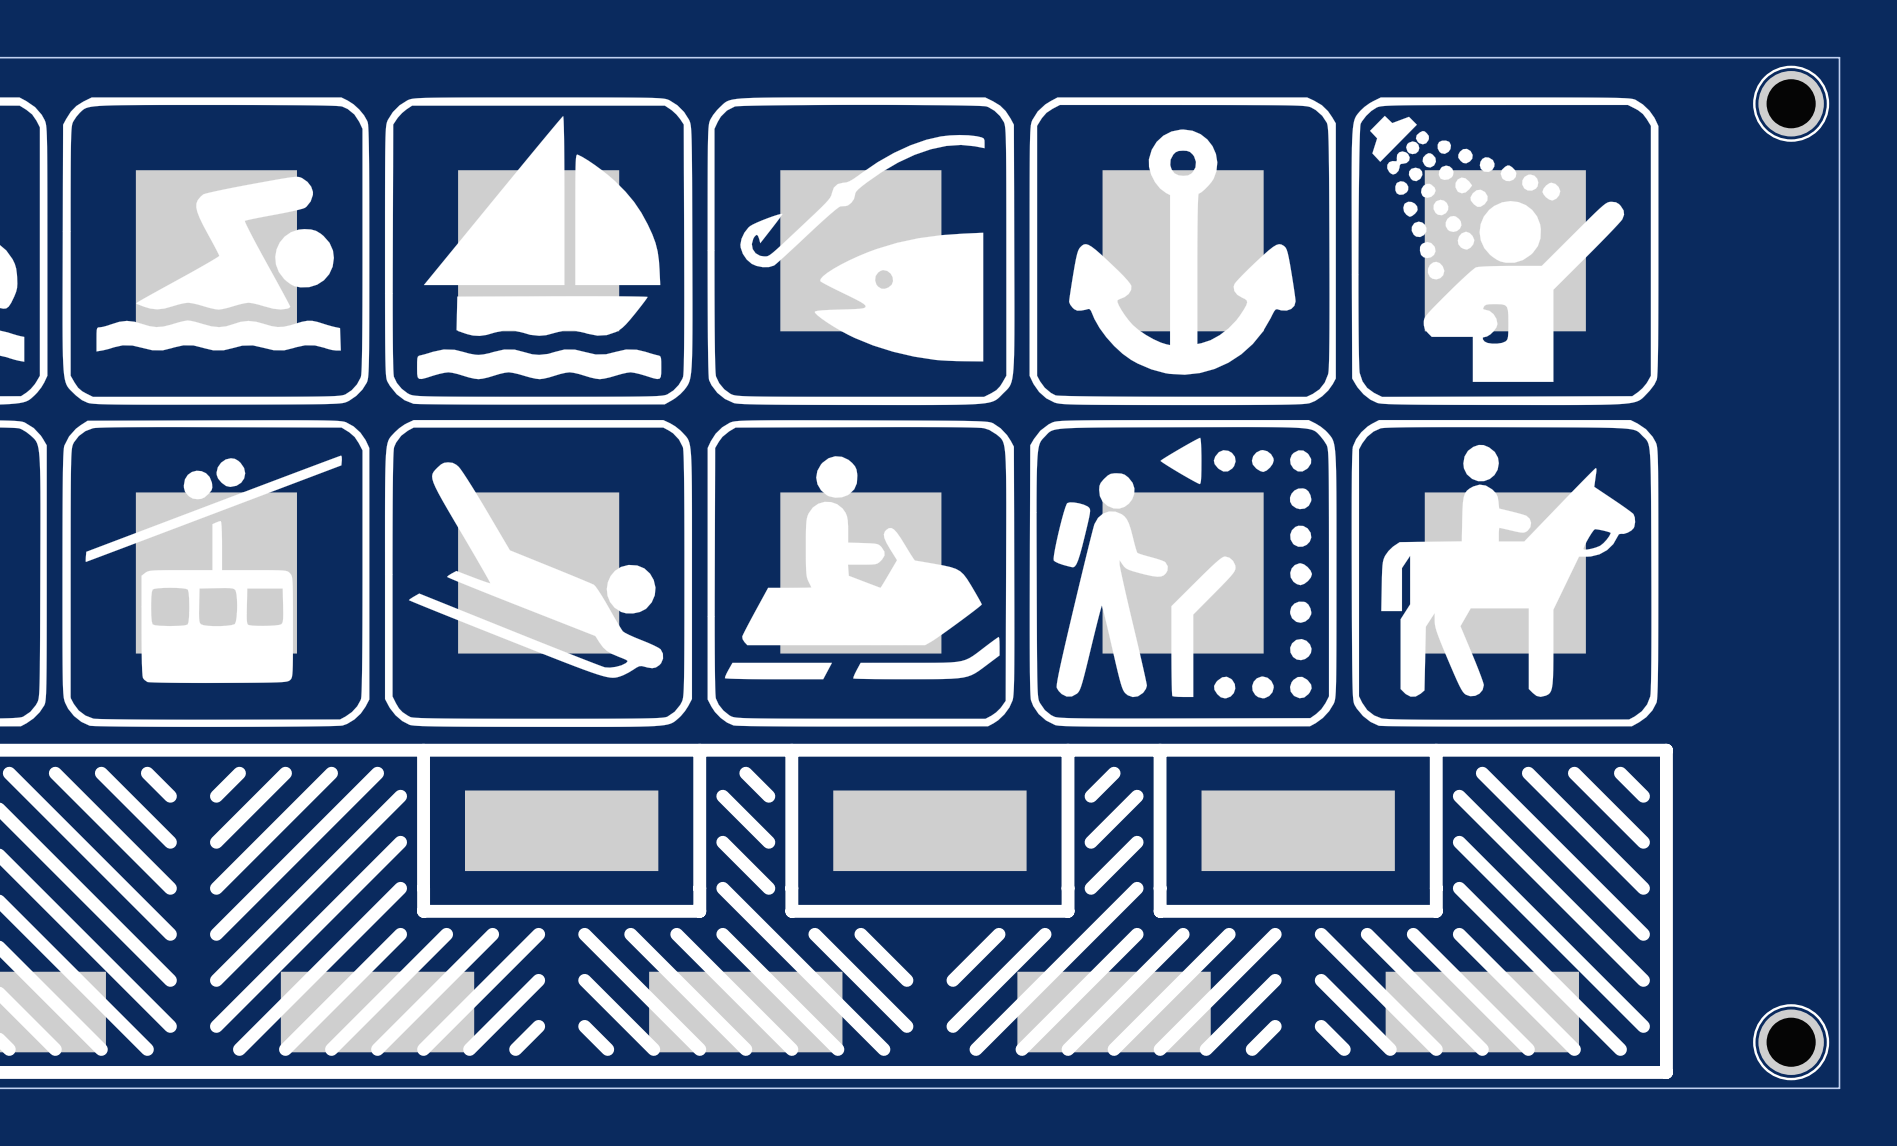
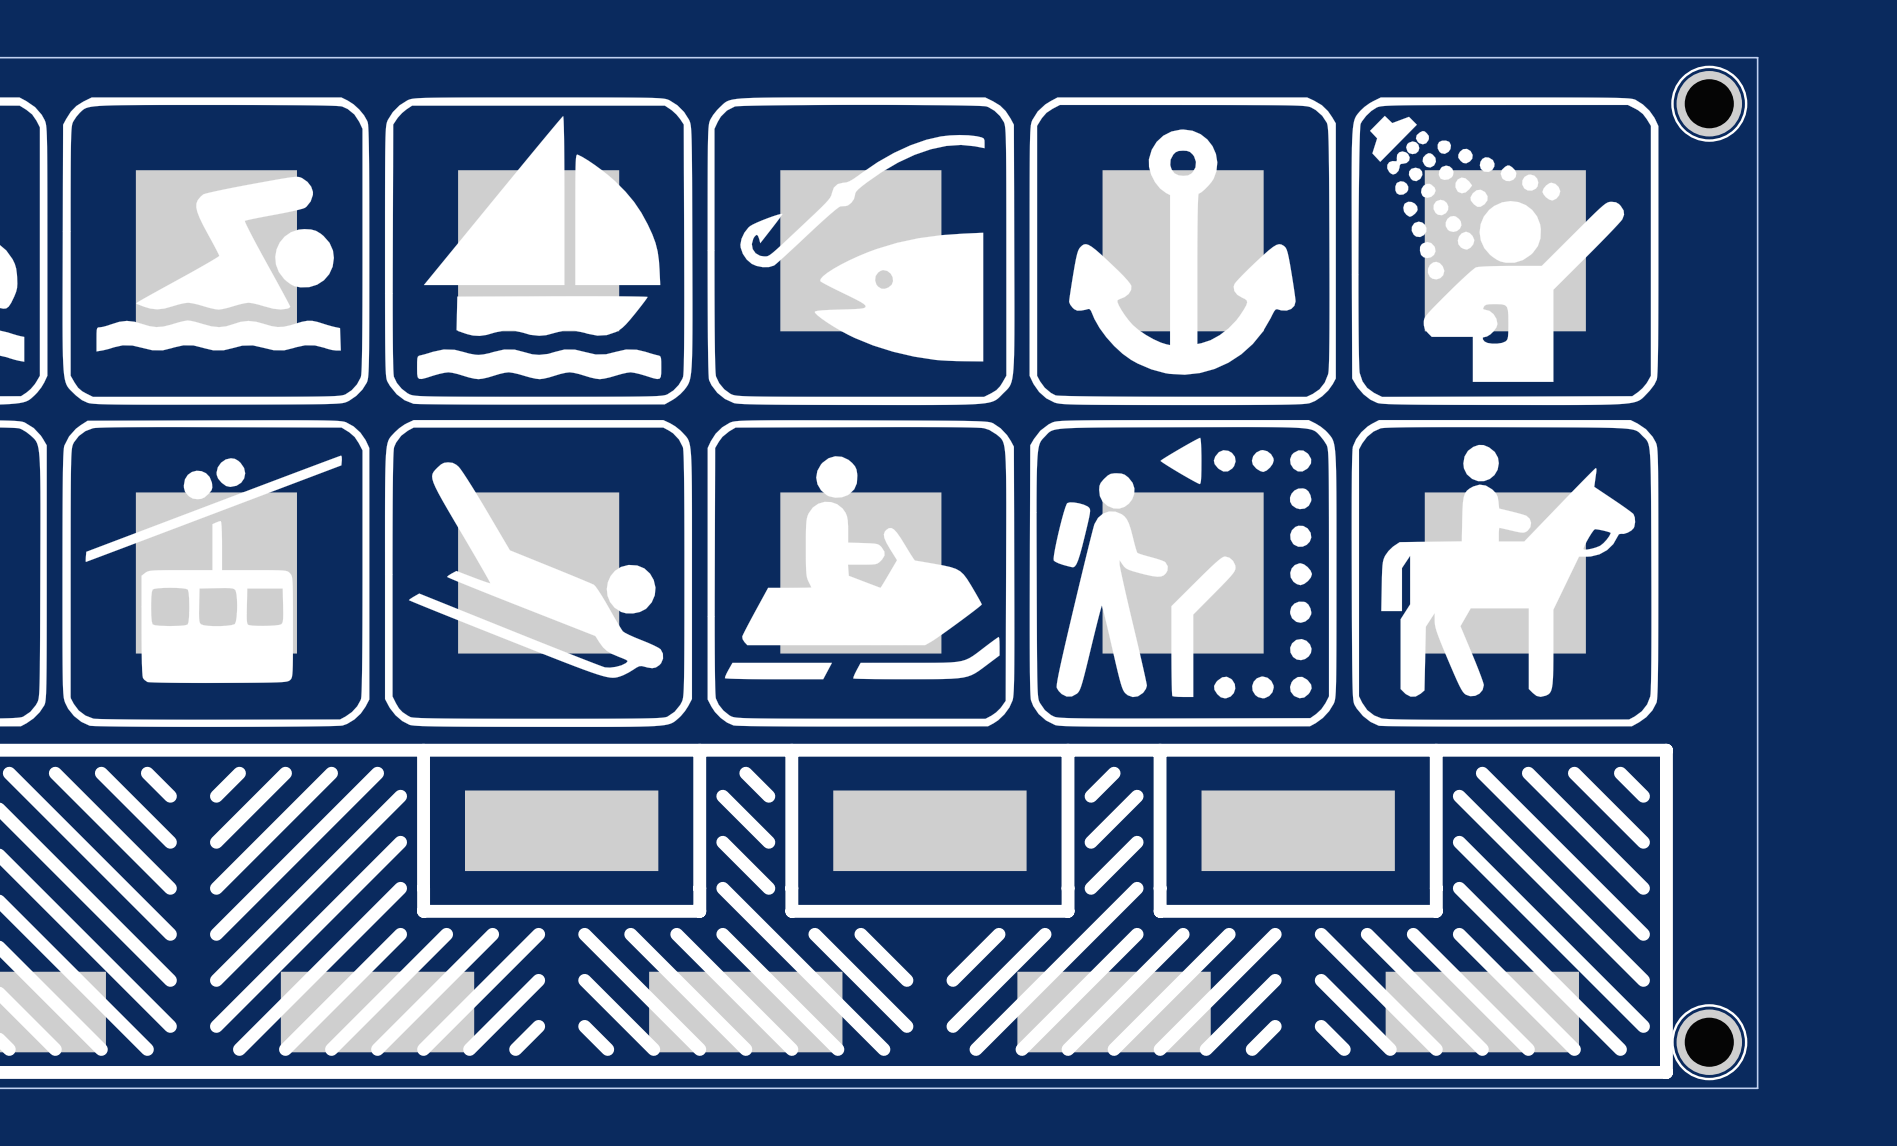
board edge: (1757, 57) (1839, 57) (1839, 1088) (1757, 1088) -> (1757, 57) (1757, 1088)
part position: (1791, 103) -> (1709, 103)
part position: (1791, 1042) -> (1709, 1042)

